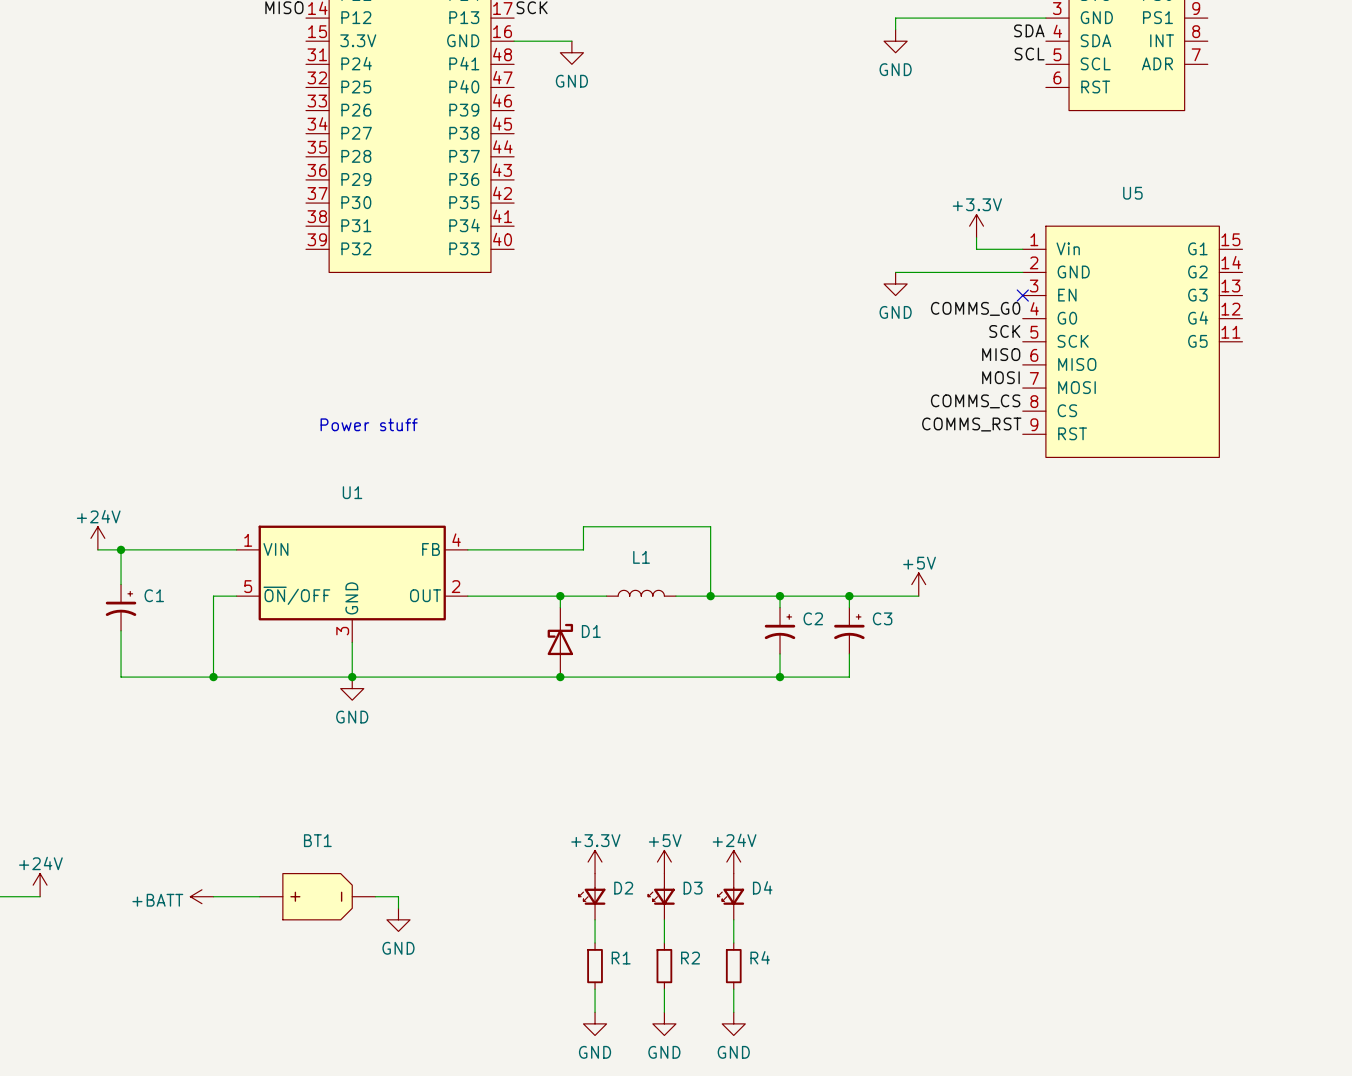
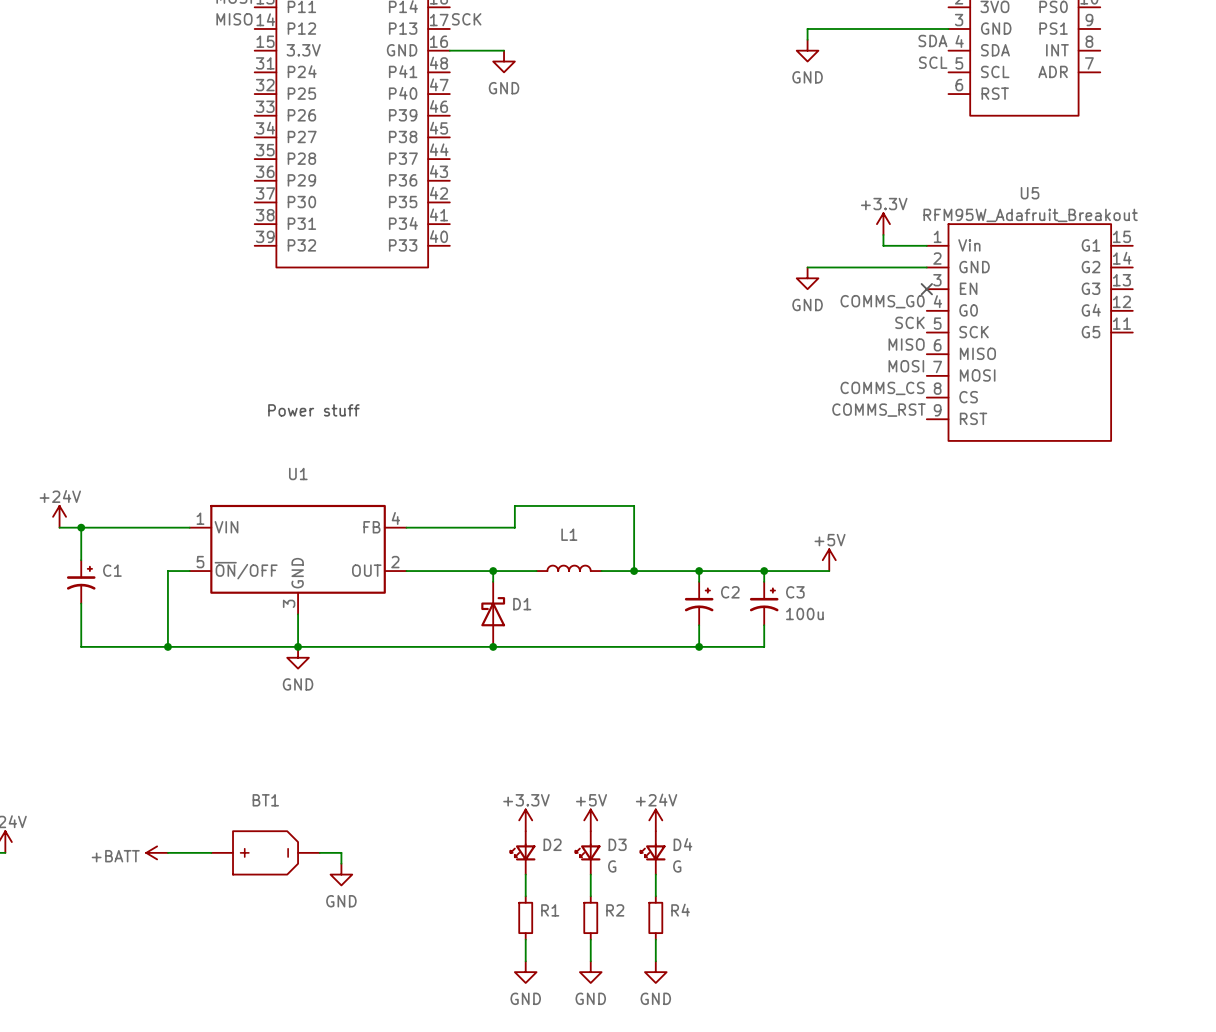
U5 value: none -> RFM95W_Adafruit_Breakout (1030, 215)
C3 value: none -> 100u (804, 613)
D3 value: none -> G (612, 866)
D4 value: none -> G (677, 866)

